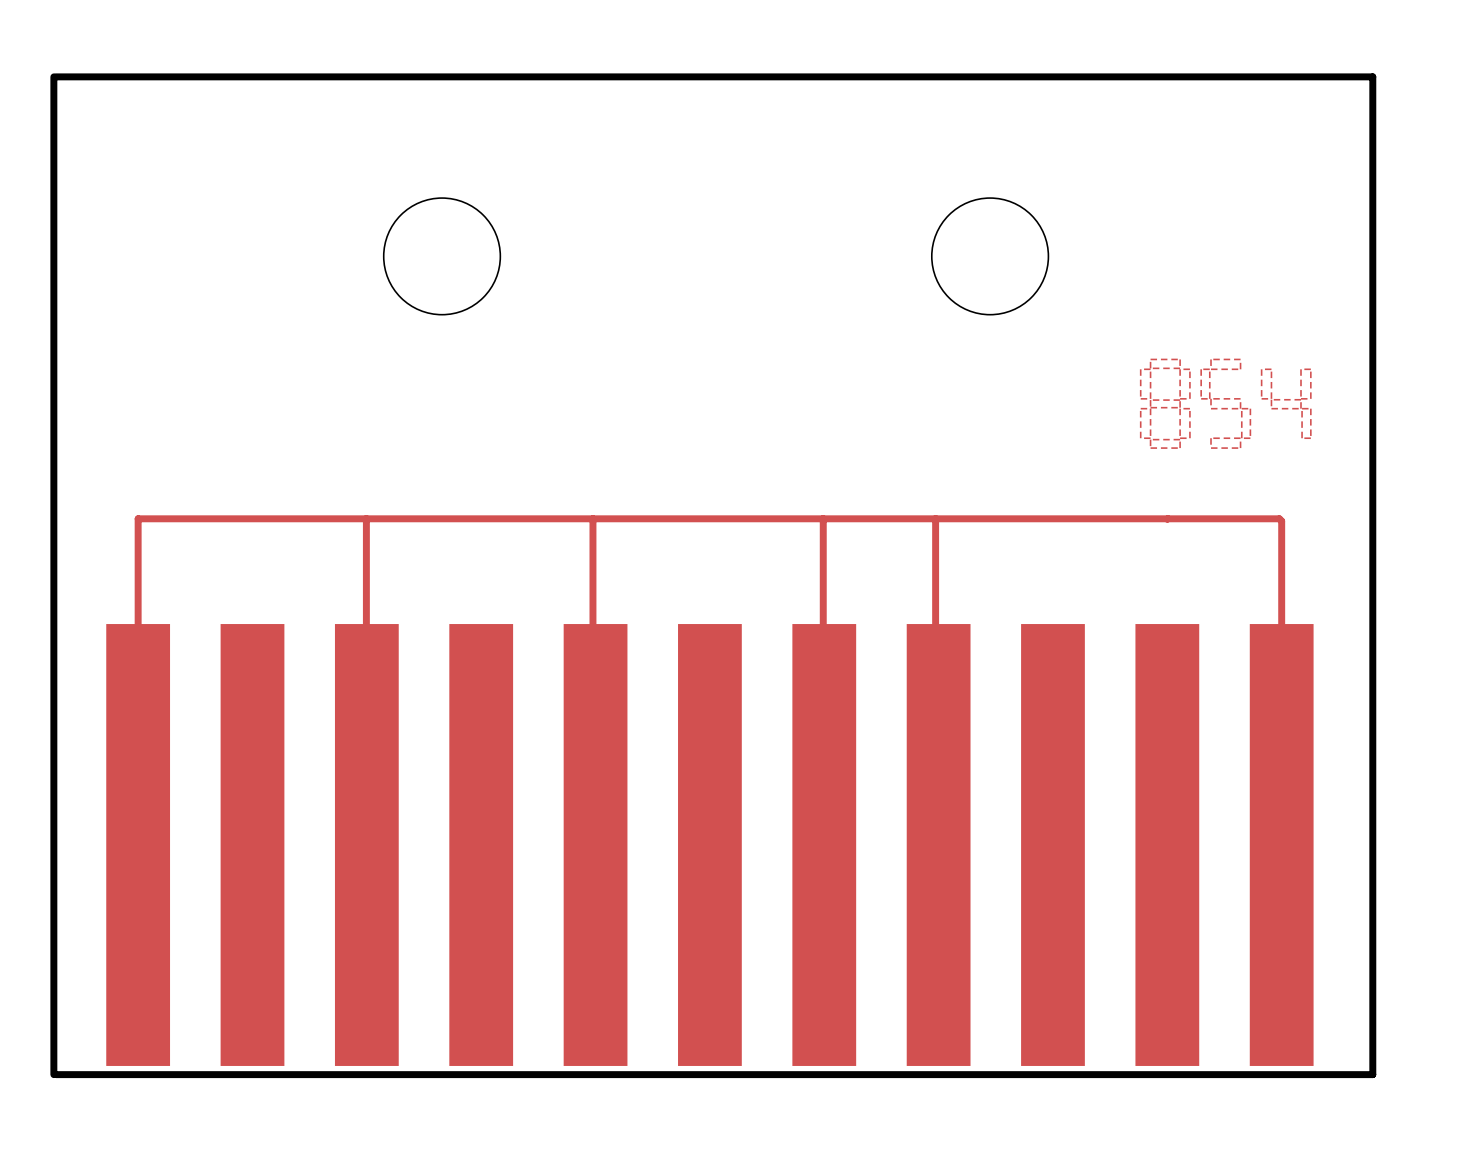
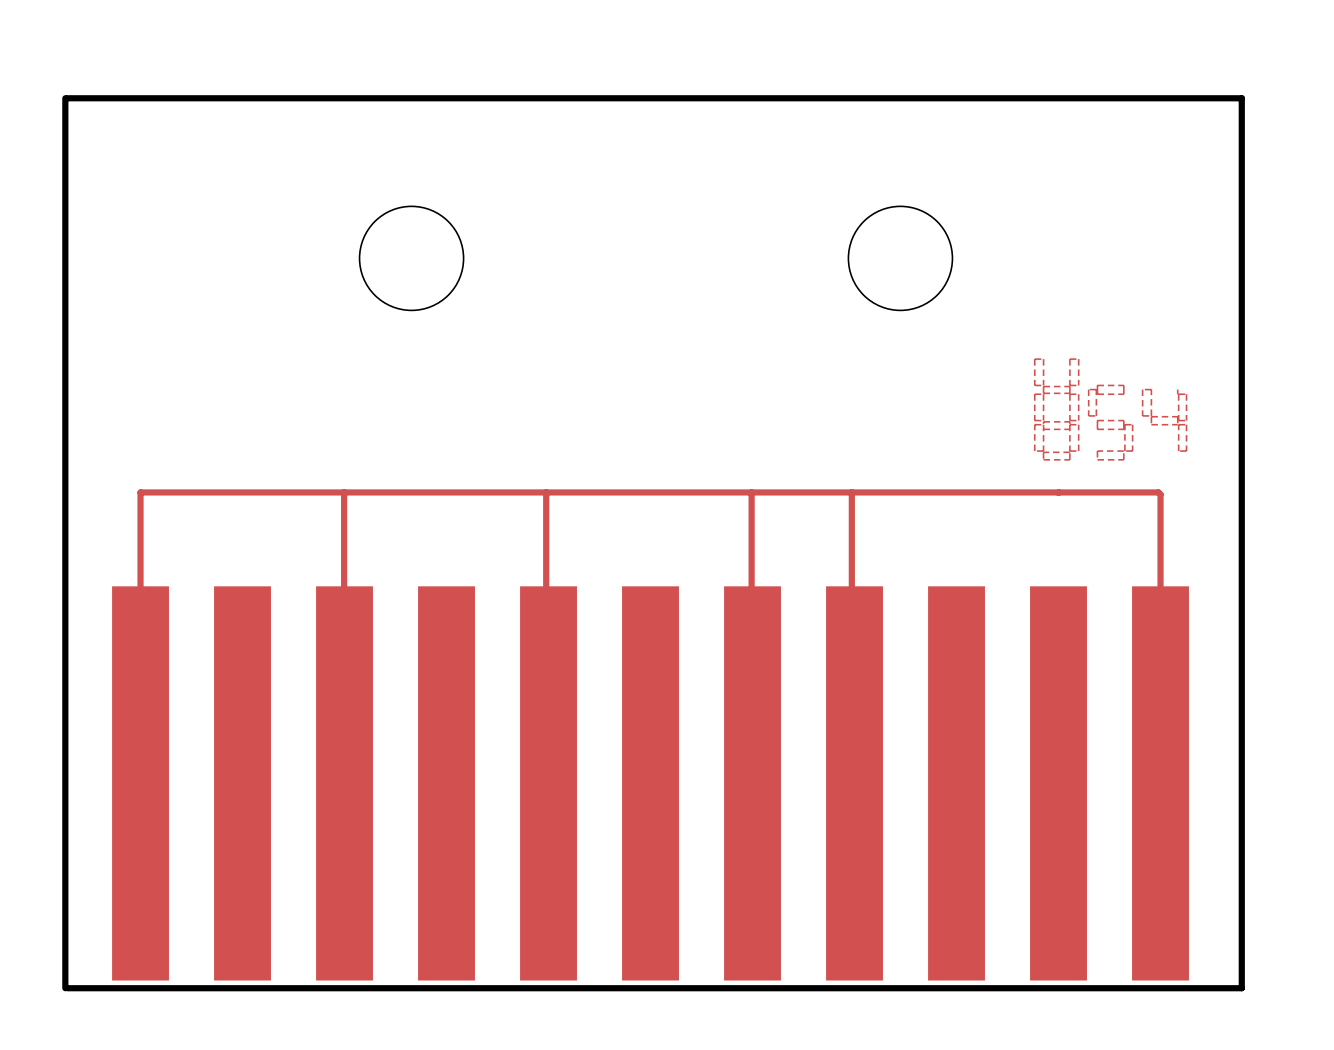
top zone outline: (1150, 359) (1150, 368) (1180, 368) (1180, 359) (1150, 359) -> (1043, 452) (1043, 459) (1069, 459) (1069, 452) (1043, 452)
top zone outline: (1211, 359) (1240, 359) (1240, 369) (1211, 369) (1211, 359) -> (1097, 451) (1123, 451) (1123, 459) (1097, 459) (1097, 451)
top zone outline: (1201, 369) (1209, 369) (1209, 398) (1201, 398) (1201, 369) -> (1088, 389) (1096, 389) (1096, 415) (1088, 415) (1088, 389)
top zone outline: (1261, 369) (1271, 369) (1271, 398) (1261, 398) (1261, 369) -> none
top zone outline: (1301, 369) (1310, 369) (1310, 398) (1301, 398) (1301, 369) -> none
top zone outline: (1271, 403) (1271, 399) (1301, 399) (1301, 403) -> (1151, 389) (1142, 389) (1142, 415) (1151, 415) (1151, 394)
top zone outline: (1241, 408) (1250, 408) (1250, 438) (1241, 438) (1241, 408) -> (1124, 424) (1132, 424) (1132, 451) (1124, 451) (1124, 424)
top zone outline: (1271, 408) (1301, 408) -> none
top zone outline: none -> (1151, 416) (1151, 424) (1177, 424) (1177, 416) (1151, 416)
top zone outline: (1150, 441) (1150, 442) -> (1043, 424) (1034, 424) (1034, 451) (1043, 451) (1043, 429)
top zone outline: (1180, 441) (1180, 442) -> (1069, 424) (1078, 424) (1078, 451) (1069, 451) (1069, 429)
top zone outline: none -> (1178, 424) (1186, 424) (1186, 451) (1178, 451) (1178, 424)

